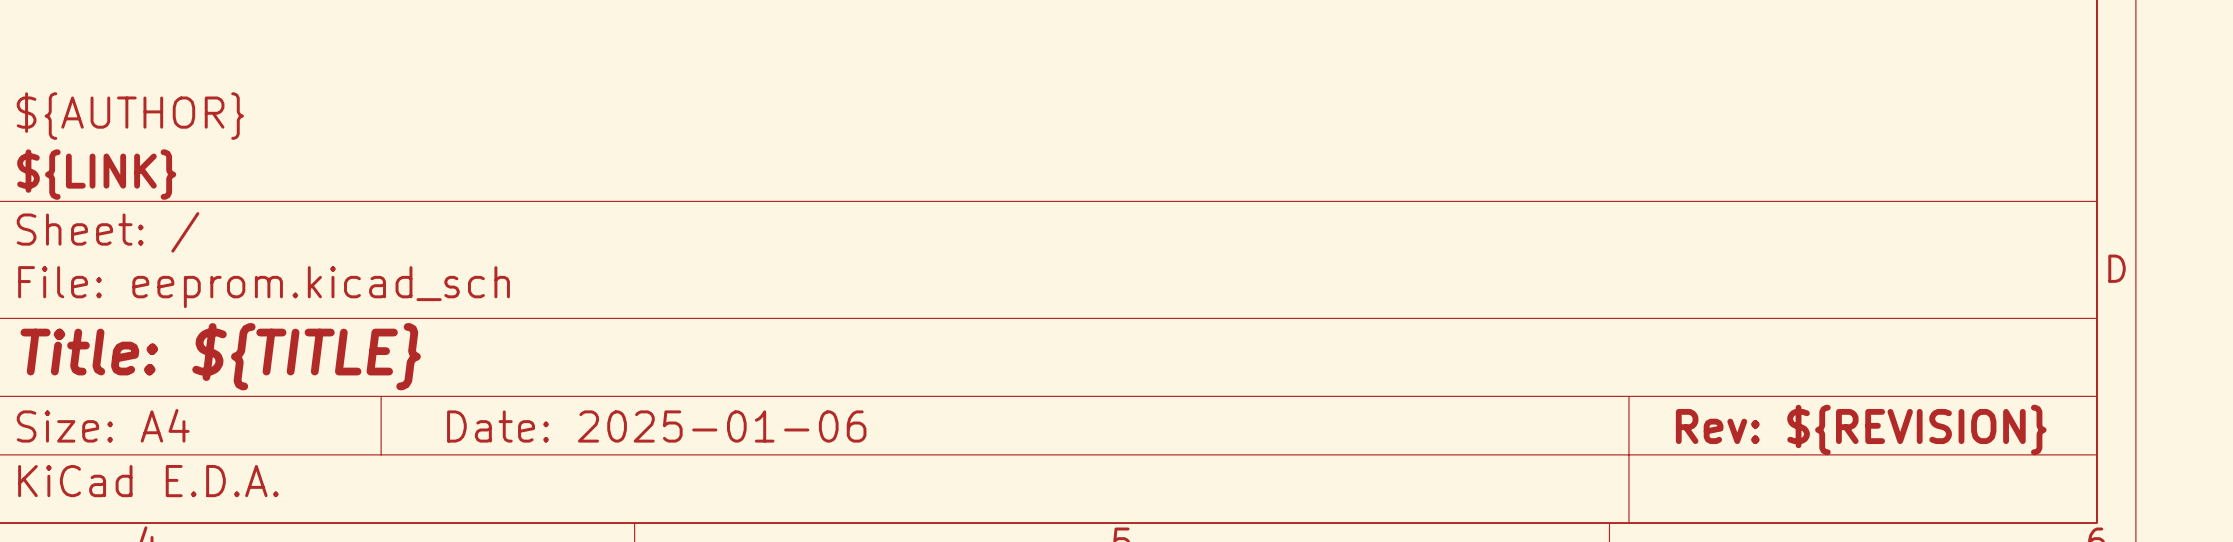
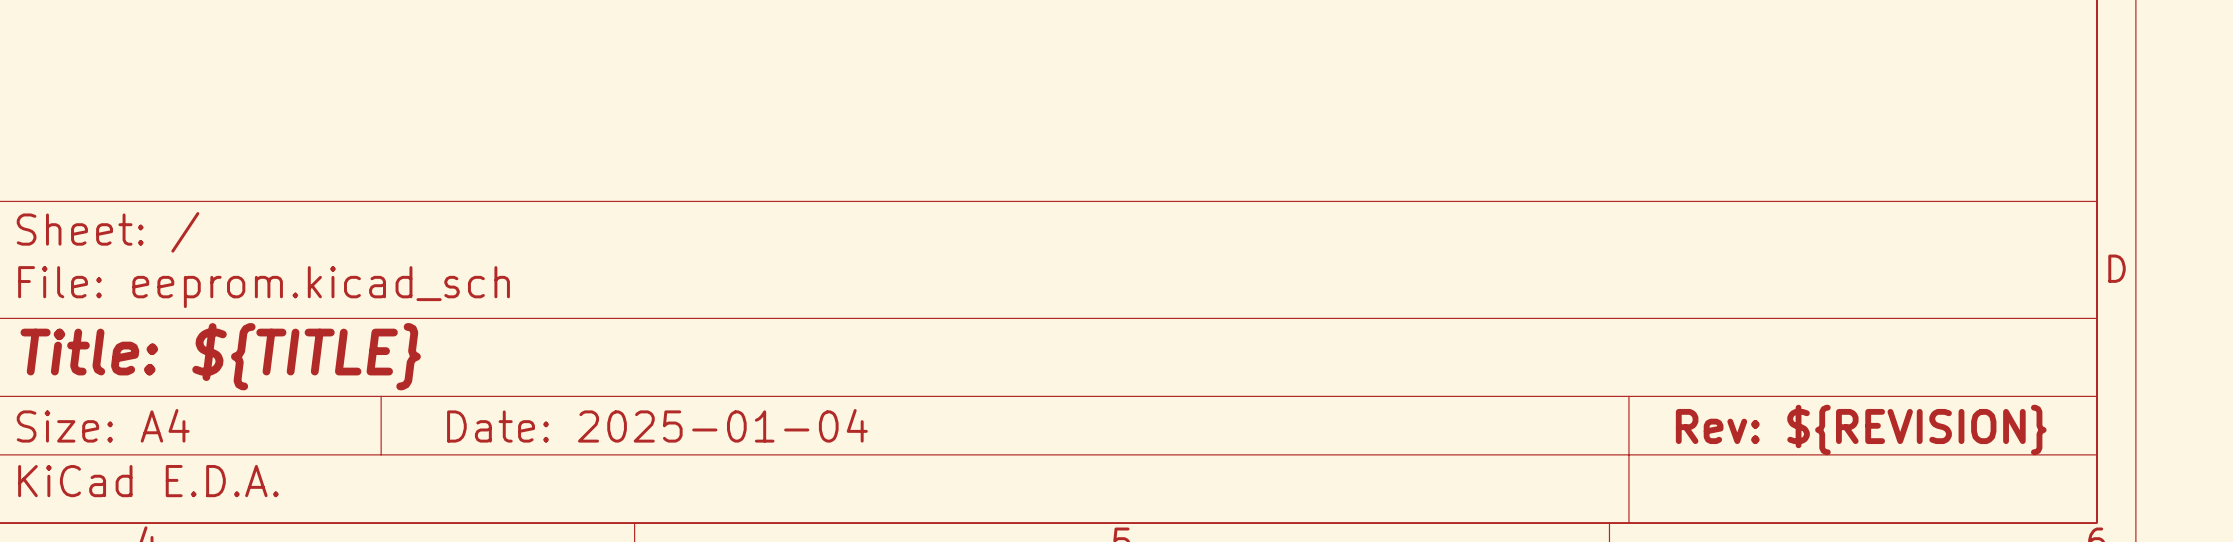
title block: ${AUTHOR} (130, 116) -> none
title block: ${LINK} (96, 174) -> none
title block: Date: 2025-01-06 (656, 426) -> Date: 2025-01-04 (657, 425)

